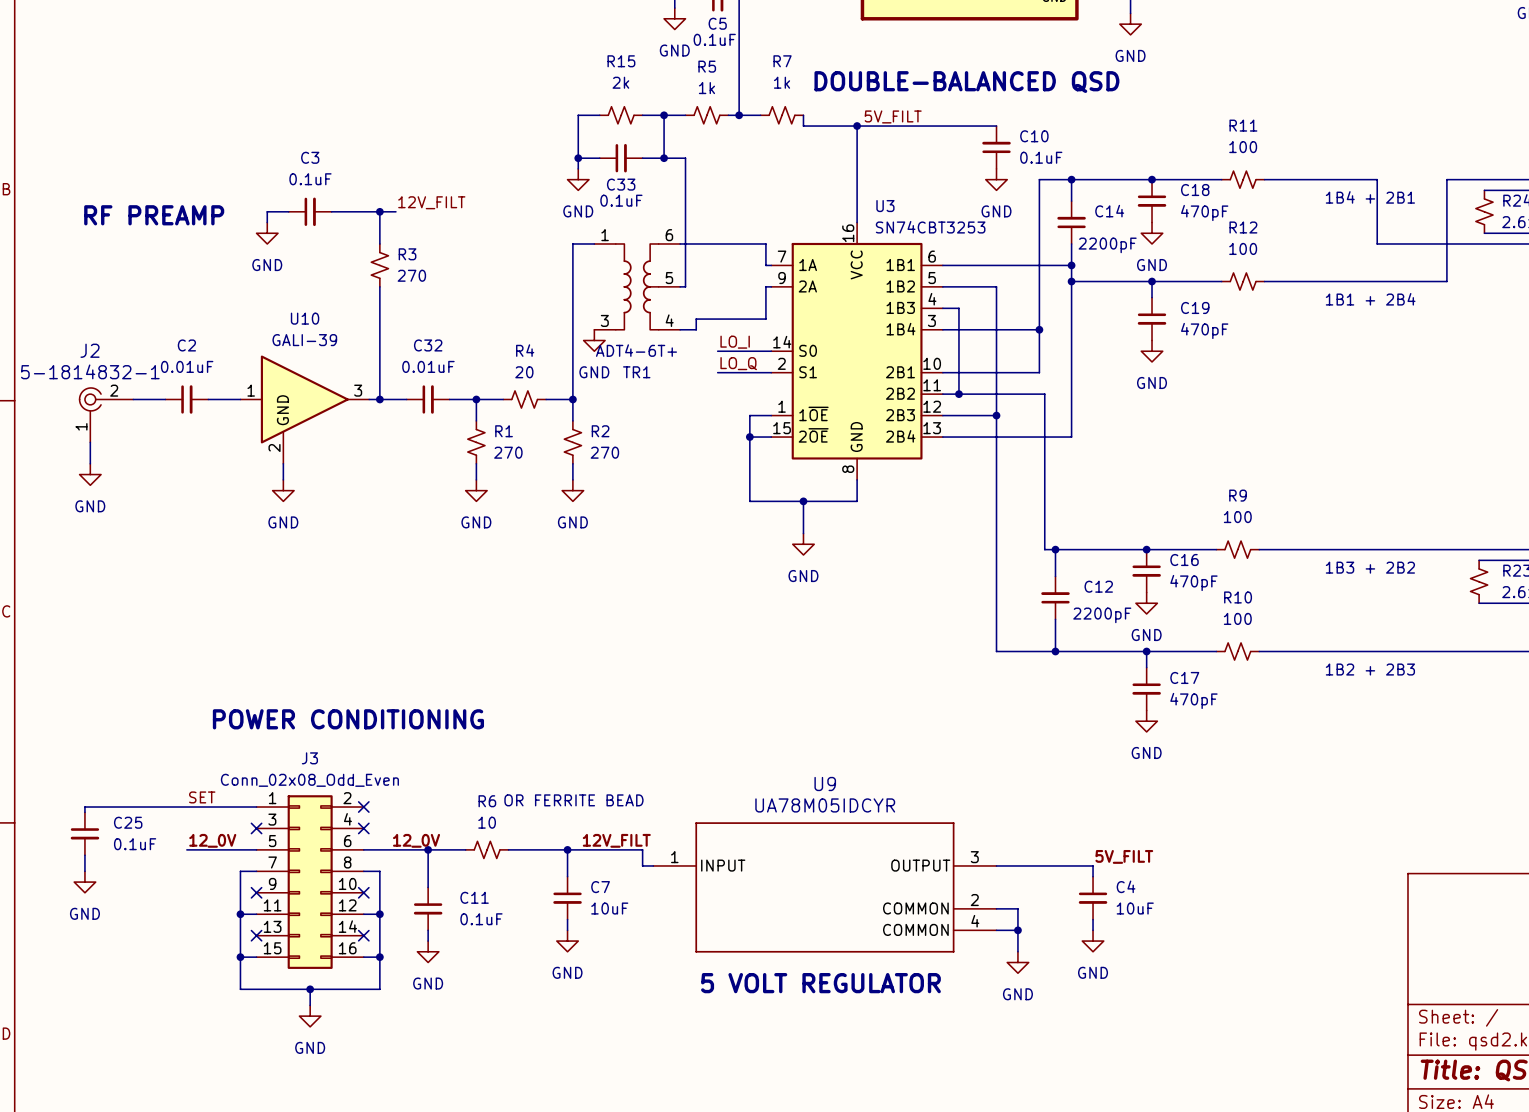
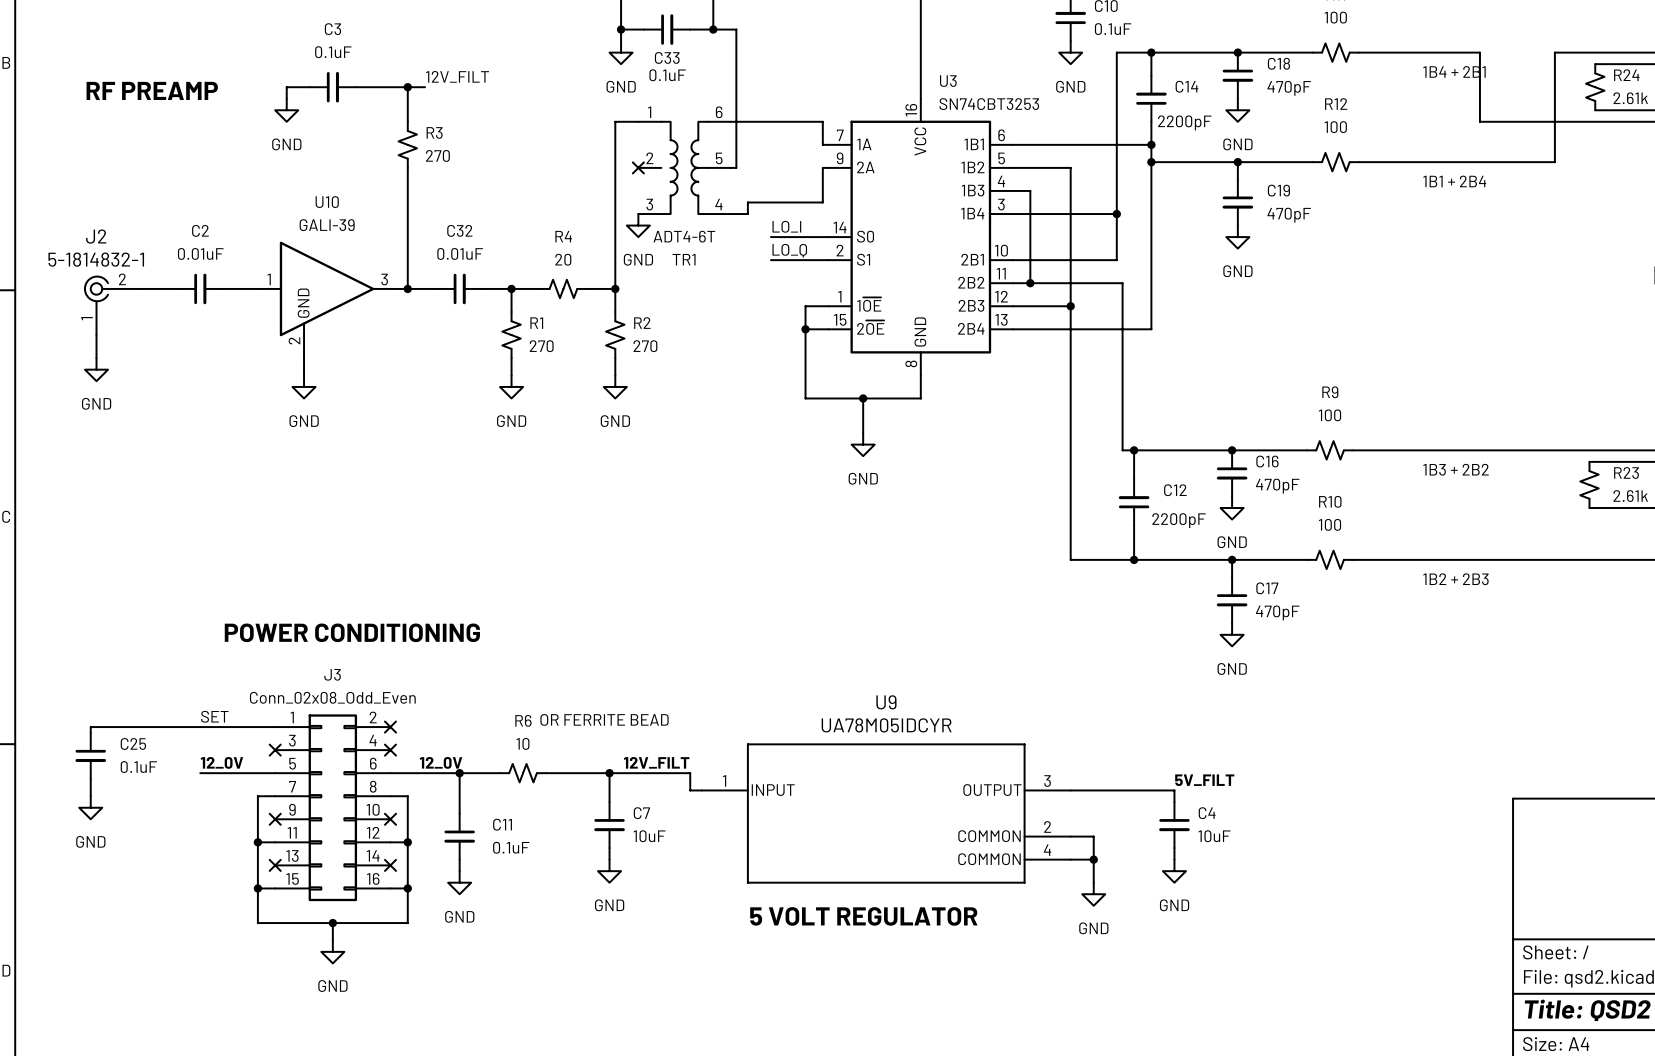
TR1 symbol: [594, 243, 681, 331] -> [638, 121, 731, 215]
no-connect mark: none -> (638, 167)
TR1 value: ADT4-6T+ (636, 350) -> ADT4-6T (684, 236)

